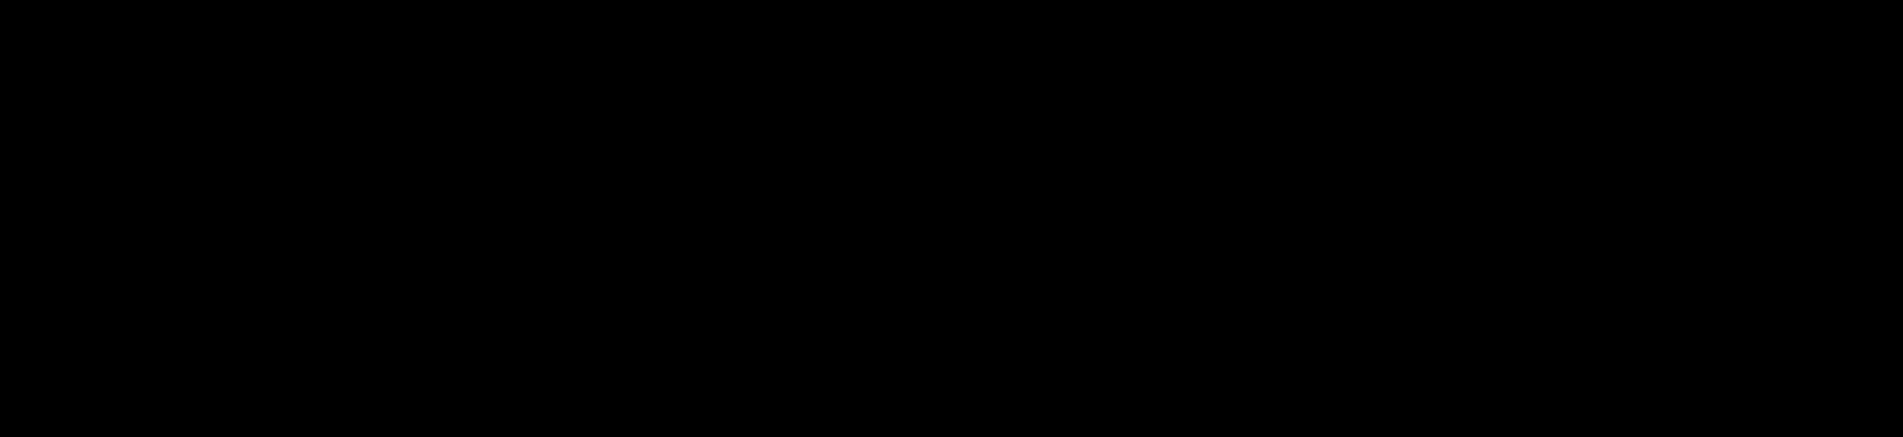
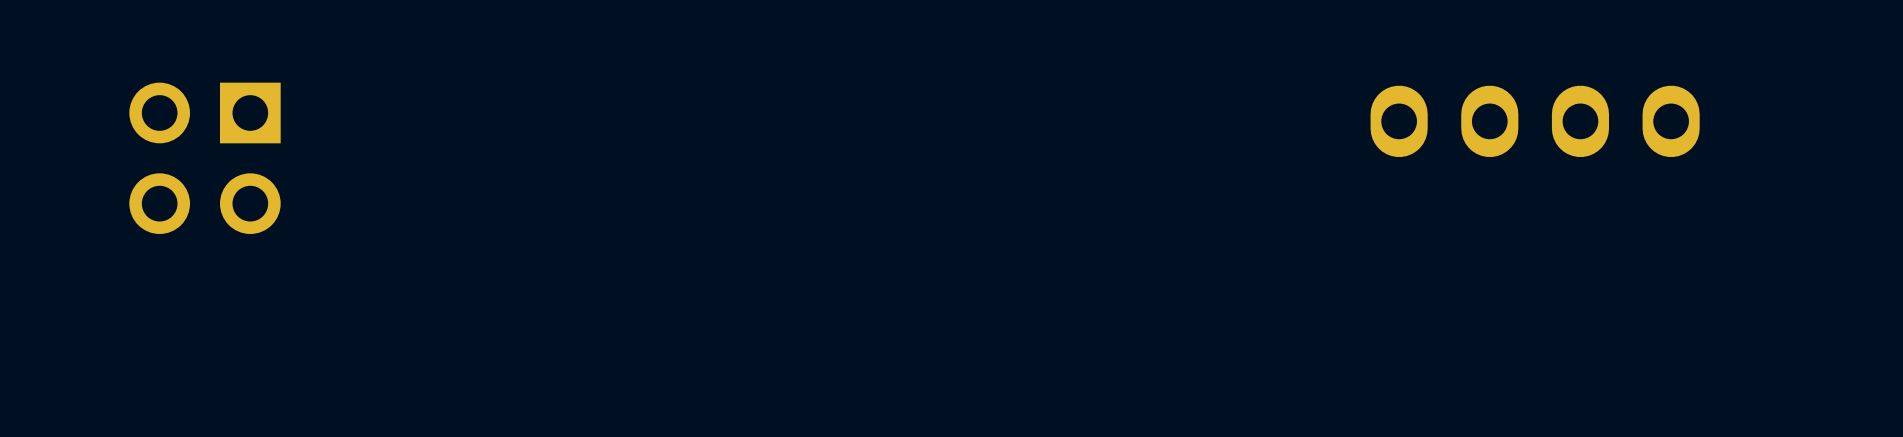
part: none -> (1535, 121)
part: none -> (205, 158)

